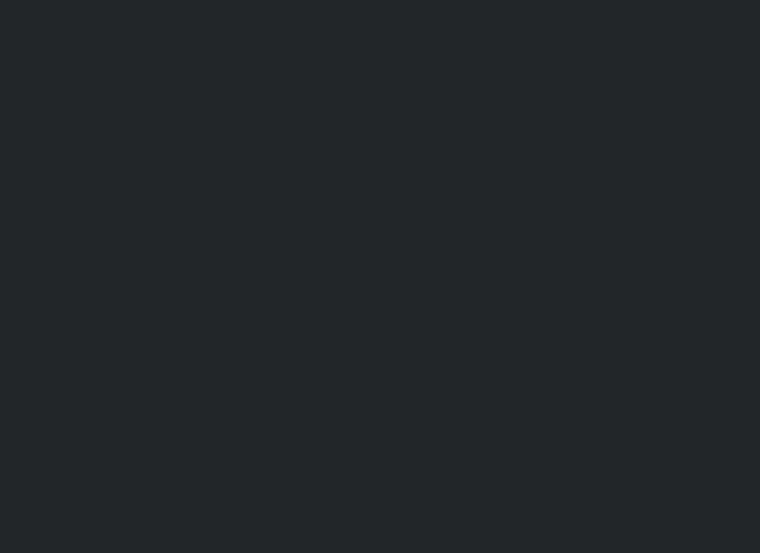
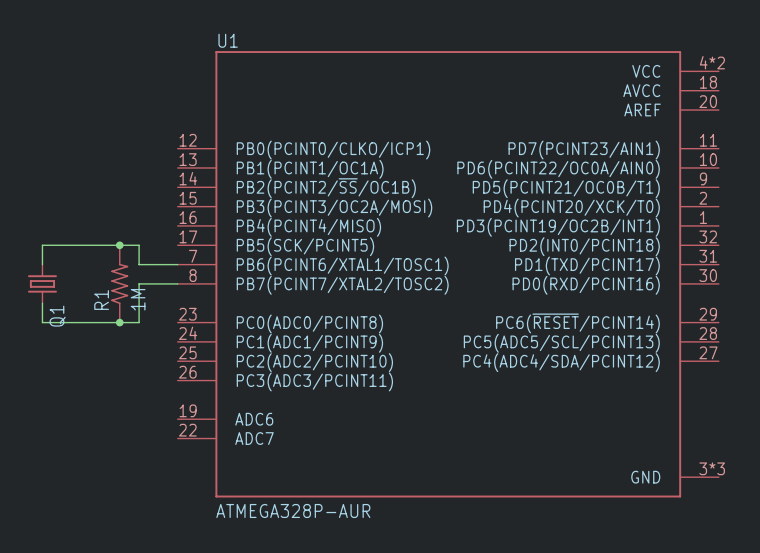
junction: none -> (119, 245)
wire: none -> (42, 264) (42, 245) (139, 245) (139, 264) (177, 264)
U1: none -> ATMEGA328P-AUR (448, 274)
Q1: none -> (42, 283)
R1: none -> 1M (119, 283)
wire: none -> (177, 283) (139, 283) (139, 322) (42, 322) (42, 303)
junction: none -> (119, 322)

